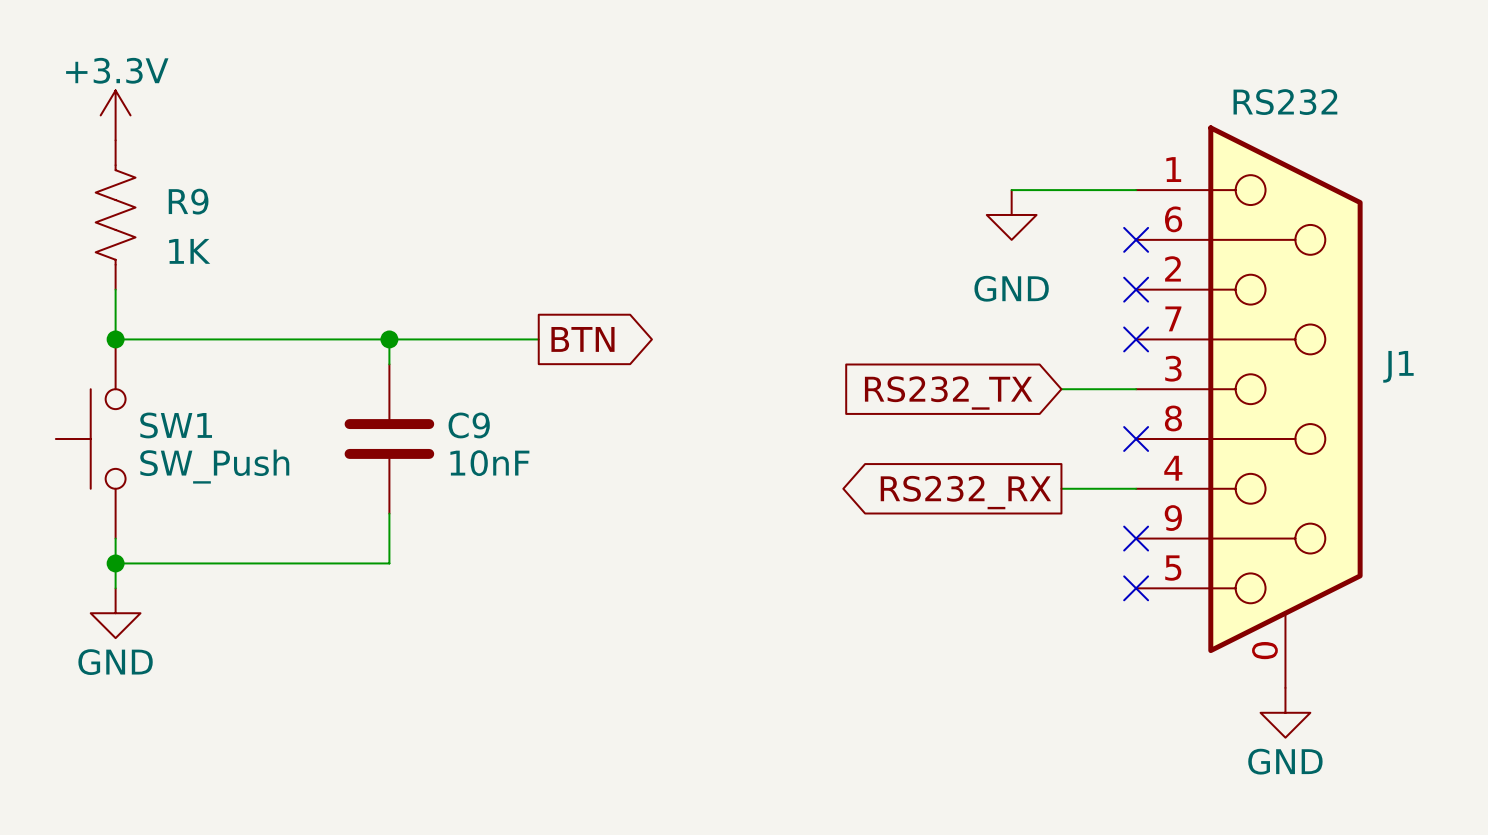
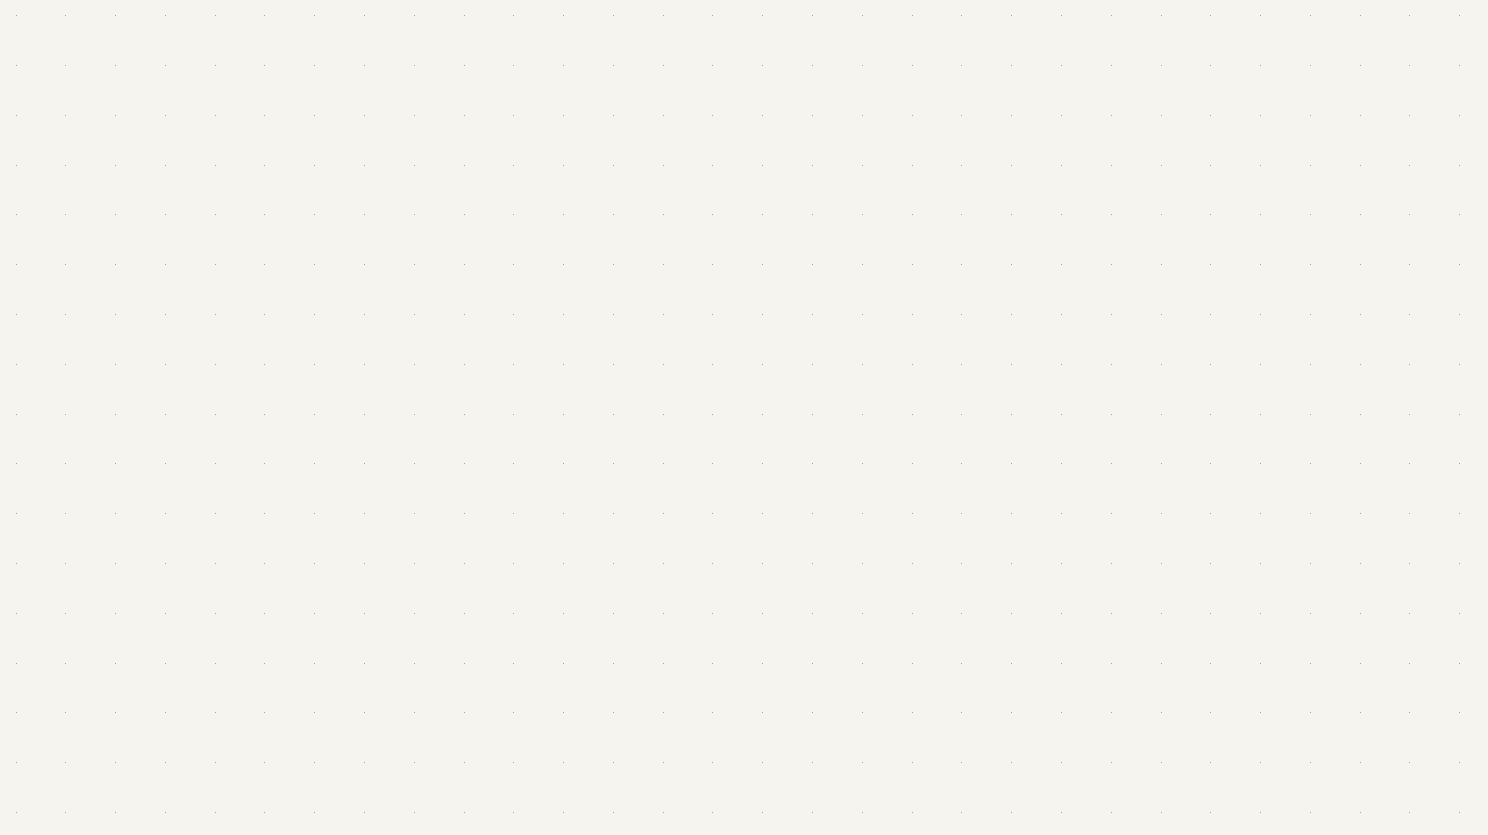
power symbol: +3.3V (115, 115) -> none
wire: (1011, 190) (1136, 190) -> none
R9: 1K (115, 214) -> none
power symbol: GND (1011, 214) -> none
no-connect mark: (1136, 239) -> none
wire: (115, 289) (115, 339) (538, 339) -> none
no-connect mark: (1136, 289) -> none
junction: (115, 339) -> none
wire: (389, 339) (389, 364) -> none
junction: (389, 339) -> none
global label: BTN (582, 339) -> none
no-connect mark: (1136, 339) -> none
wire: (1061, 389) (1136, 389) -> none
global label: RS232_TX (948, 393) -> none
J1: RS232 (1249, 406) -> none
SW1: SW_Push (90, 439) -> none
C9: 10nF (389, 439) -> none
no-connect mark: (1136, 439) -> none
wire: (1061, 488) (1136, 488) -> none
global label: RS232_RX (965, 492) -> none
wire: (389, 513) (389, 563) (115, 563) -> none
wire: (115, 538) (115, 588) -> none
no-connect mark: (1136, 538) -> none
junction: (115, 563) -> none
no-connect mark: (1136, 588) -> none
power symbol: GND (115, 613) -> none
power symbol: GND (1285, 712) -> none

